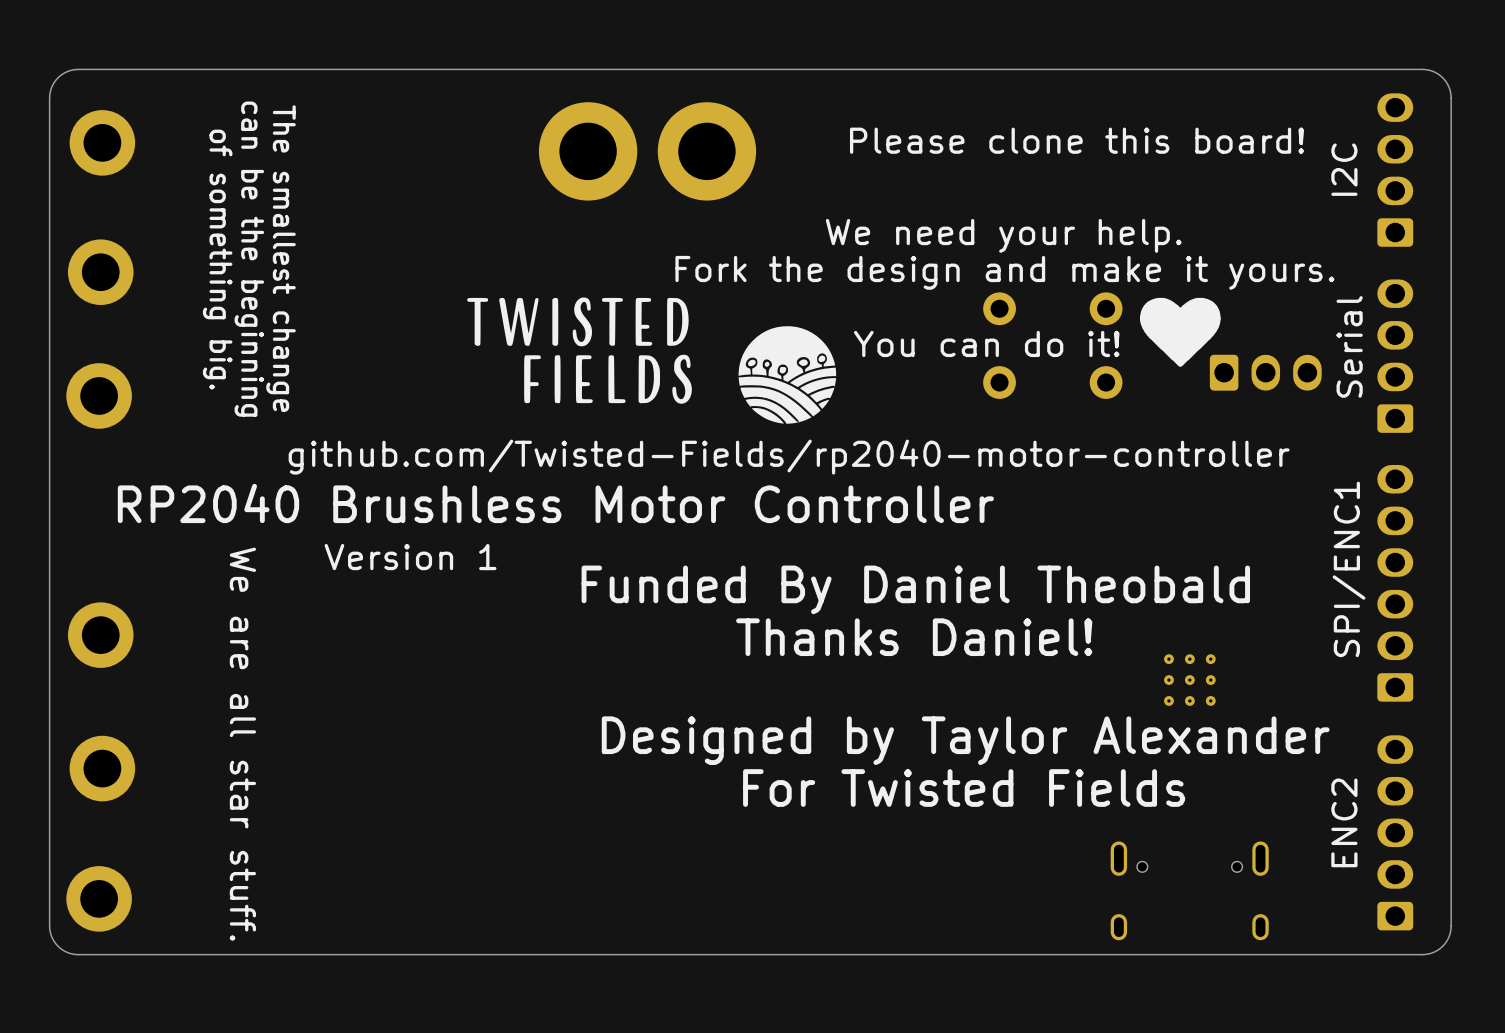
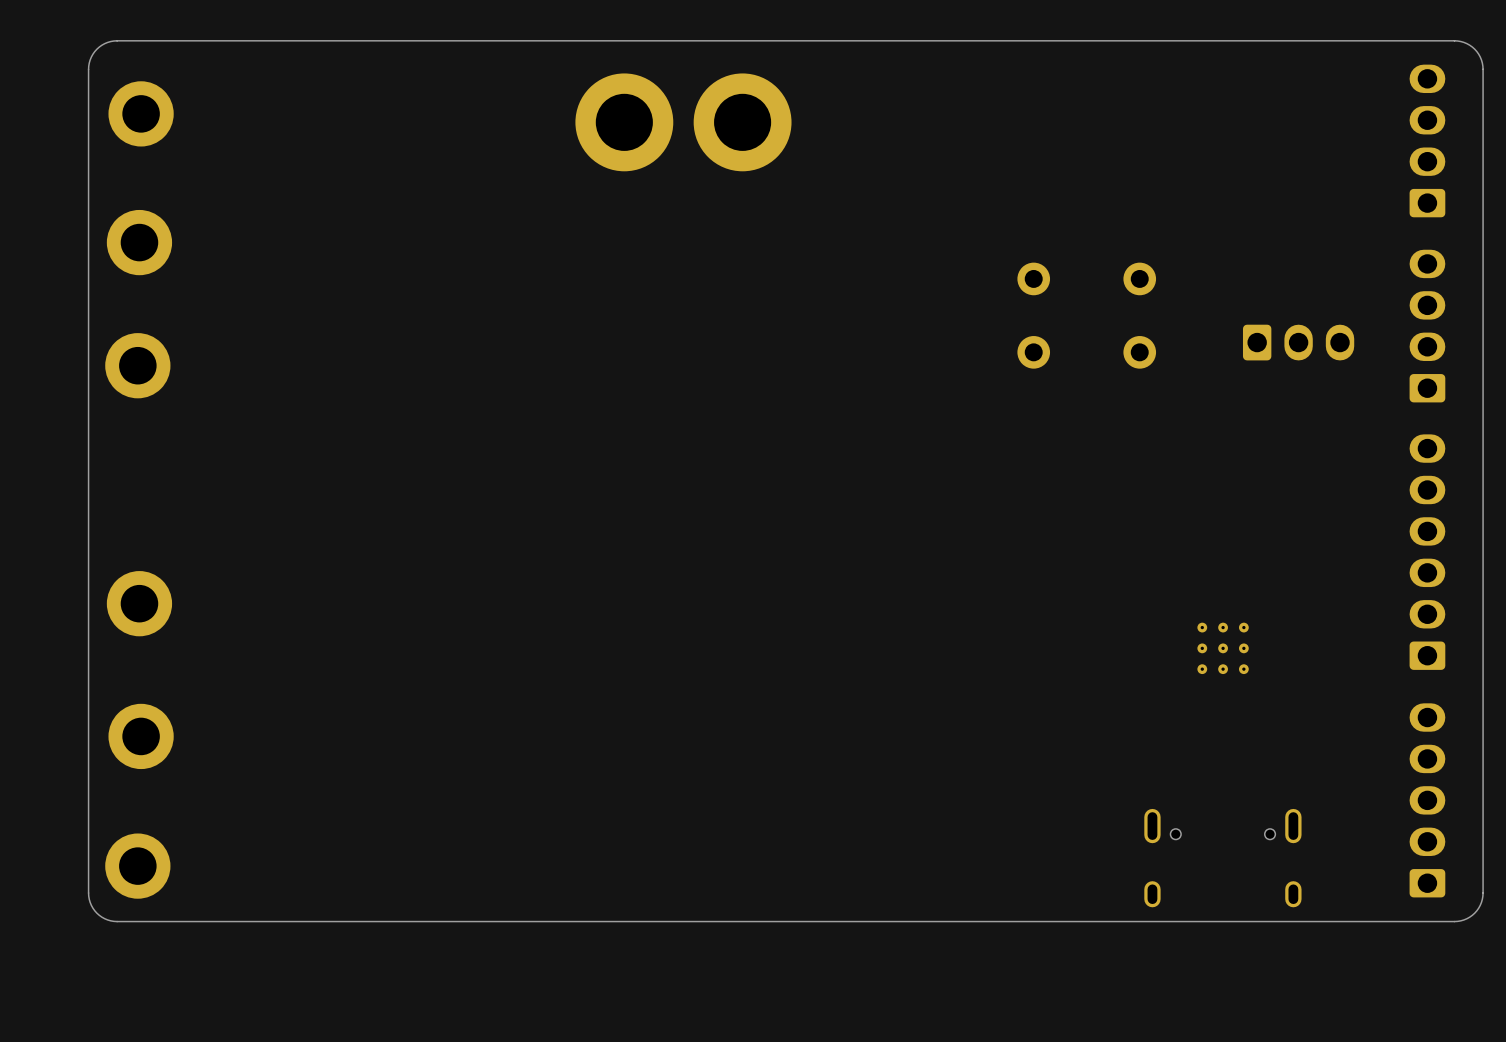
text: Please clone this board! (1077, 140) -> none
text: I2C (1344, 169) -> none
text: We need your help. (1003, 235) -> none
text: The smallest change (281, 258) -> none
text: of something big. (217, 259) -> none
text: can be the beginning (249, 259) -> none
text: Fork the design and make it yours. (1004, 272) -> none
drawing: [467, 297, 692, 404] -> none
drawing: [1139, 297, 1221, 367] -> none
drawing: [738, 326, 837, 424] -> none
text: You can do it! (986, 343) -> none
text: Serial (1349, 346) -> none
text: github.com/Twisted-Fields/rp2040-motor-controller (789, 457) -> none
text: RP2040 Brushless Motor Controller (555, 503) -> none
text: Version 1 (410, 557) -> none
text: SPI/ENC1 (1349, 569) -> none
text: Funded By Daniel Theobald (915, 589) -> none
text: Thanks Daniel! (914, 637) -> none
text: Designed by Taylor Alexander (965, 740) -> none
text: We are all star stuff. (242, 744) -> none
text: For Twisted Fields (964, 788) -> none
text: ENC2 (1344, 822) -> none

